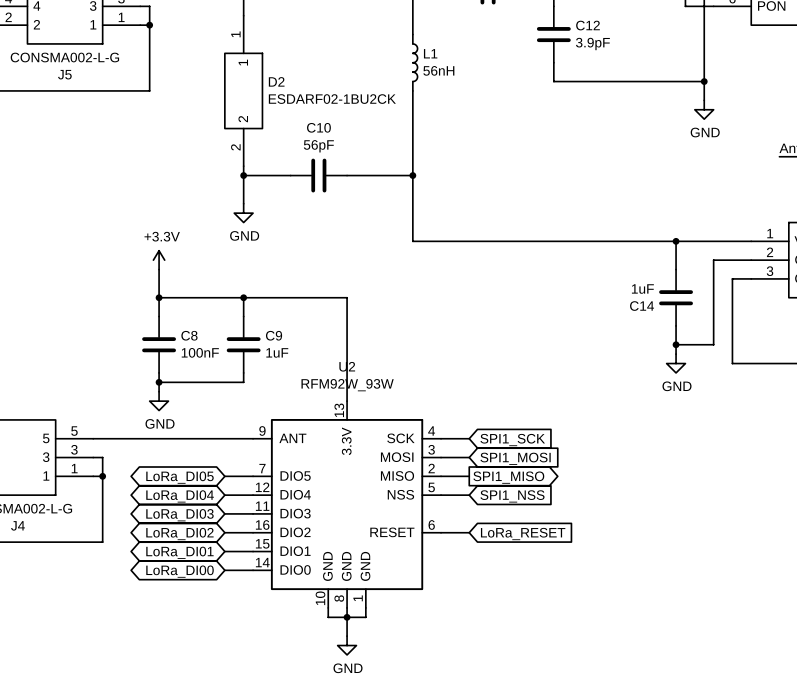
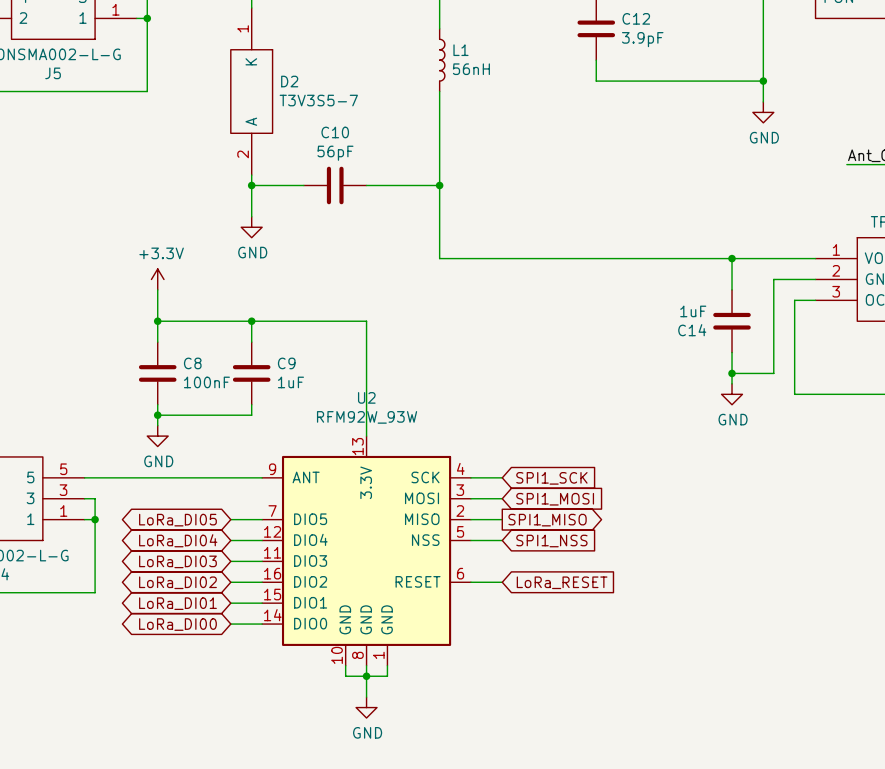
D2 pin name: 1 (243, 62) -> K (251, 61)
D2 value: ESDARF02-1BU2CK (332, 99) -> T3V3S5-7 (318, 100)
D2 pin name: 2 (243, 119) -> A (251, 121)

